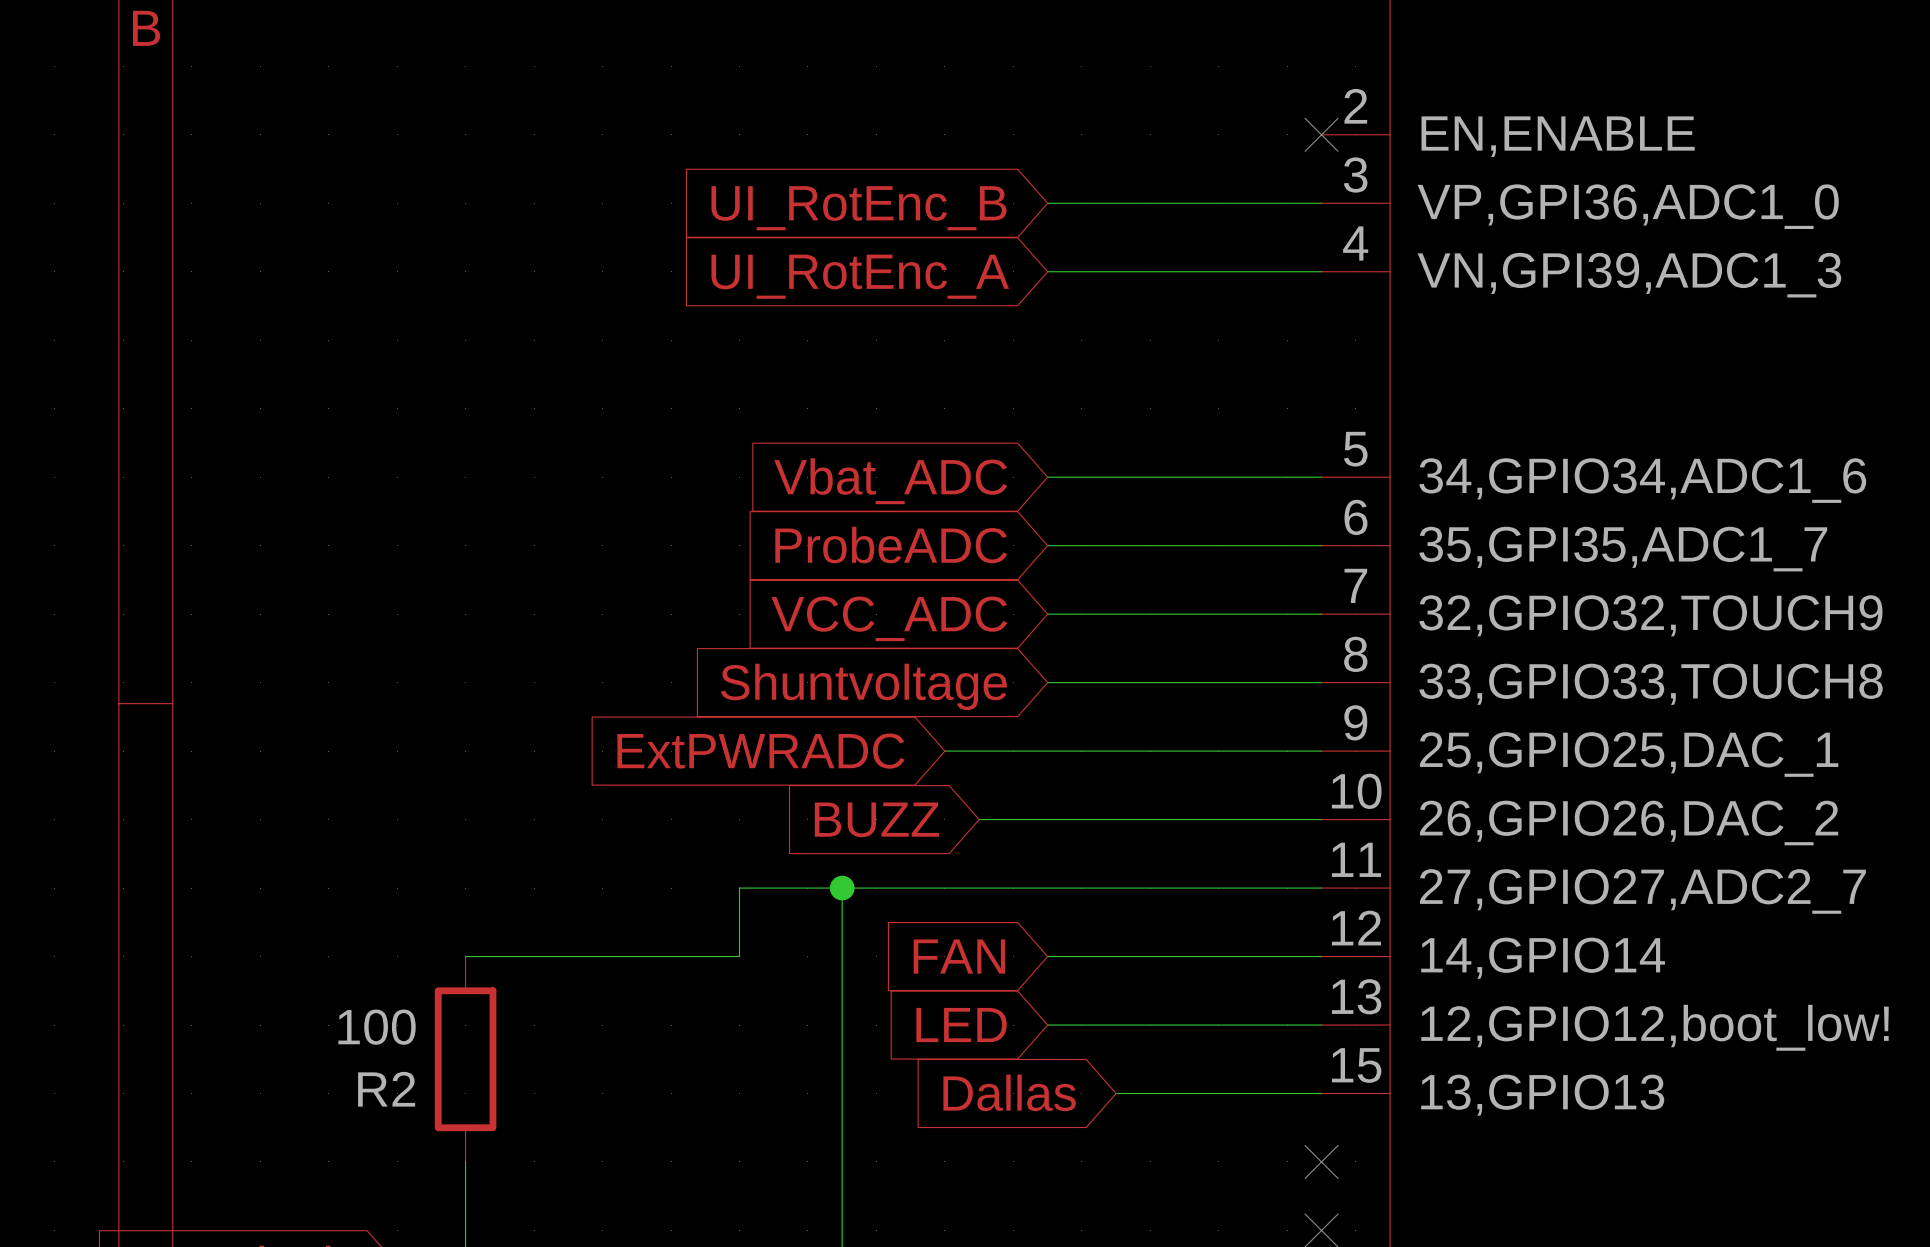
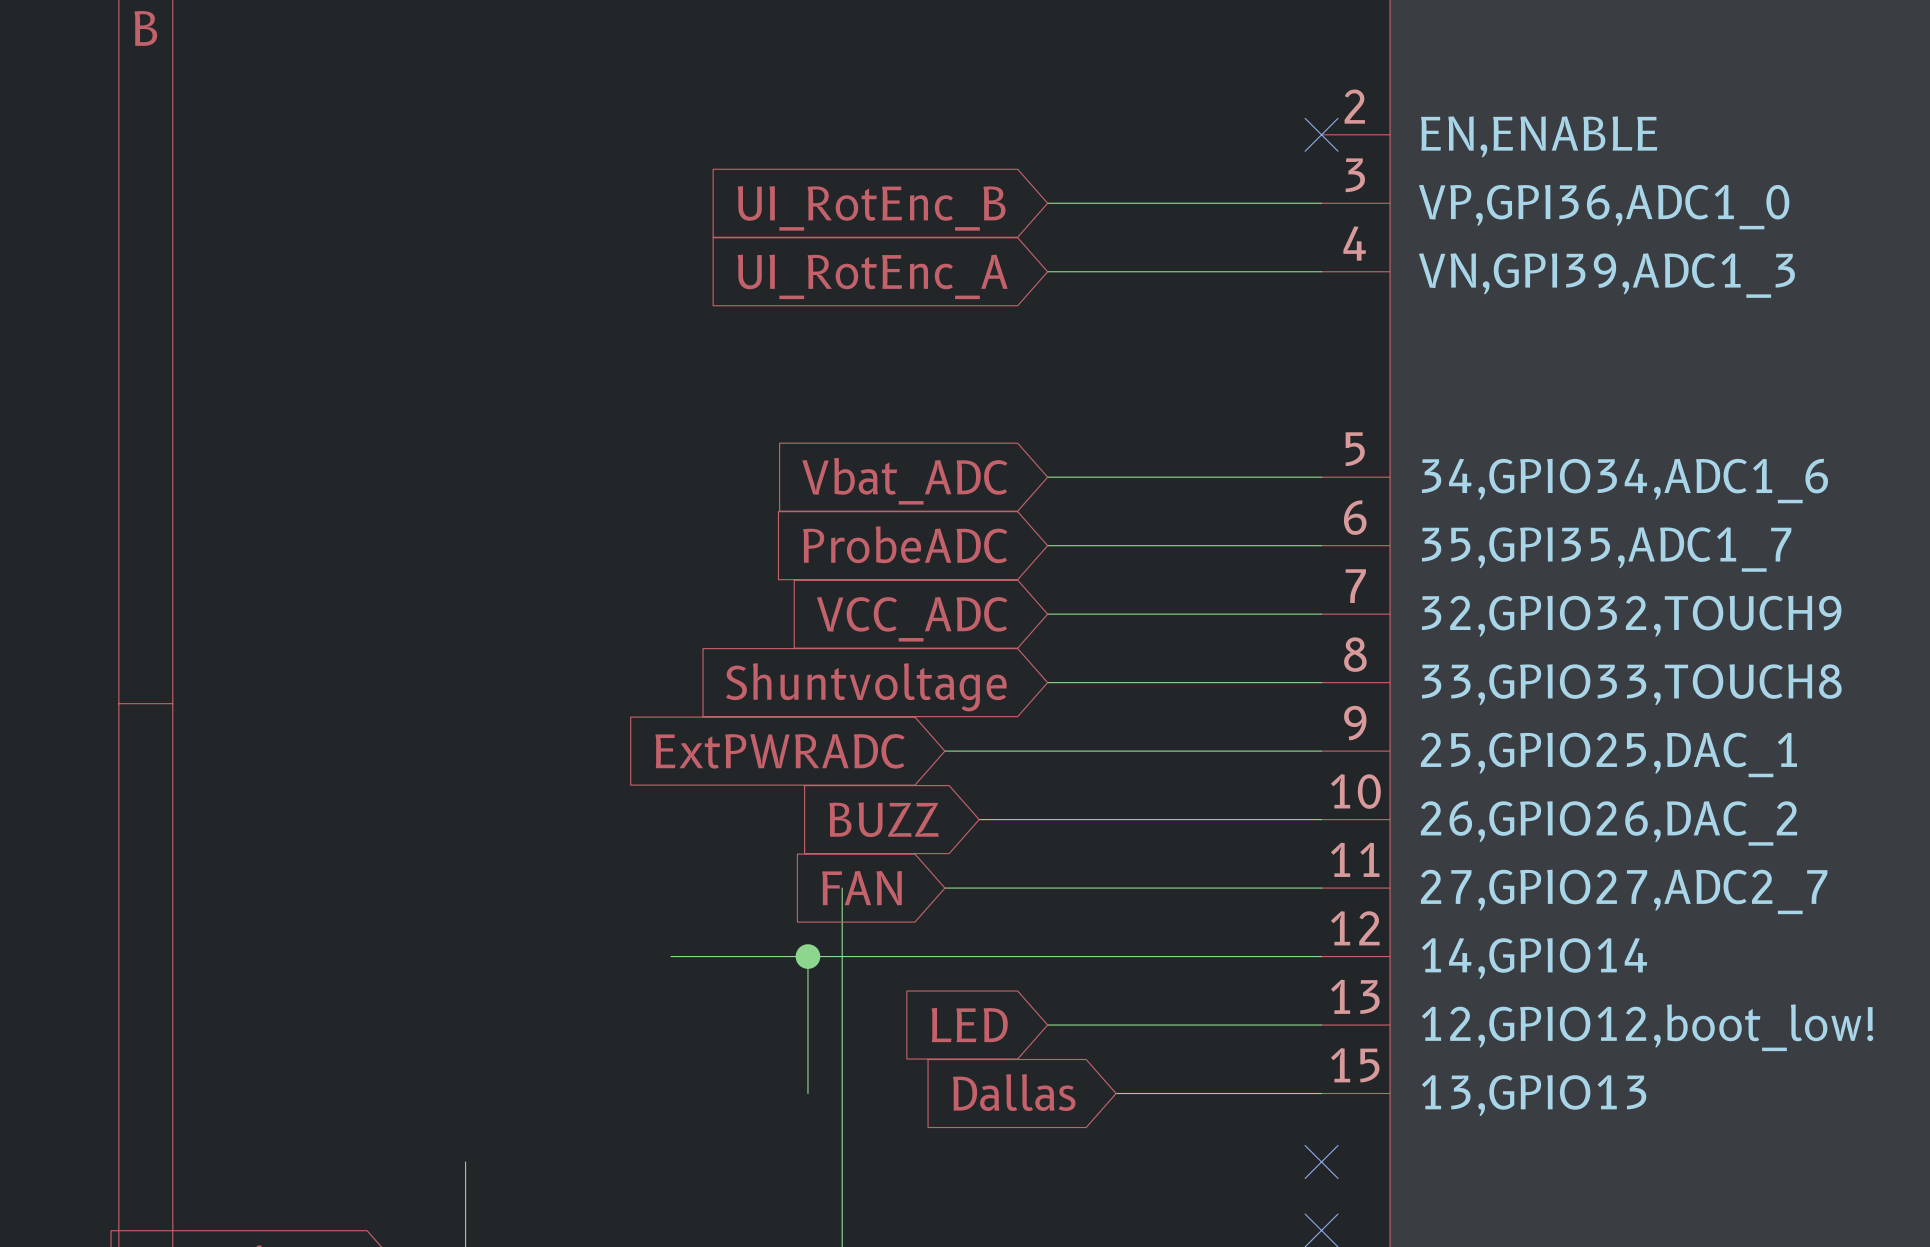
junction position: (842, 888) -> (807, 956)
wire: (944, 888) (739, 888) (739, 956) -> (1047, 956) (739, 956)
wire: (465, 956) (671, 956) -> none
wire: none -> (807, 956) (807, 1093)
global label position: FAN (959, 956) -> FAN (861, 888)
R2: 100 (465, 1059) -> none

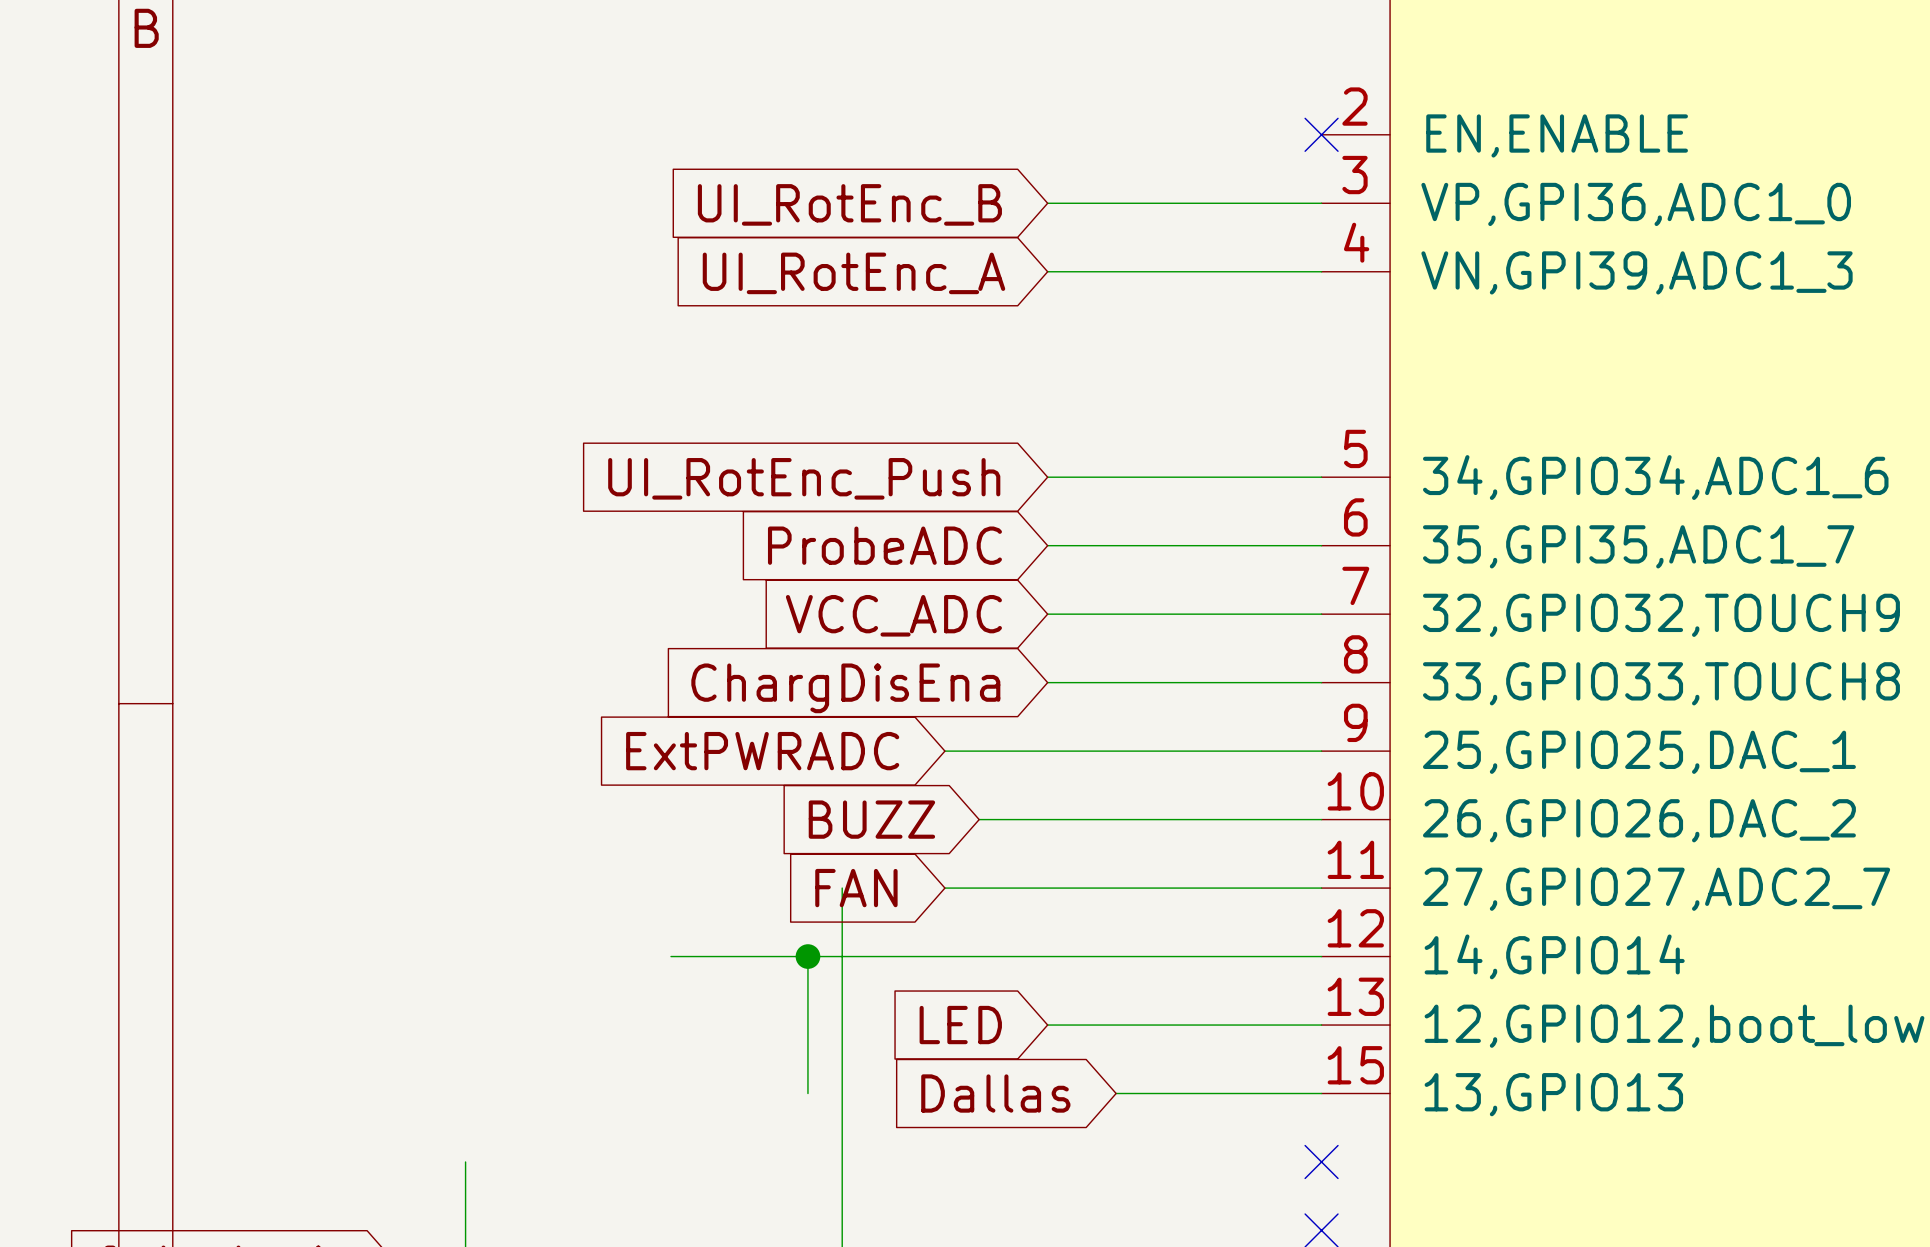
global label: Vbat_ADC (904, 481) -> UI_RotEnc_Push (804, 478)
global label: Shuntvoltage (866, 687) -> ChargDisEna (845, 688)

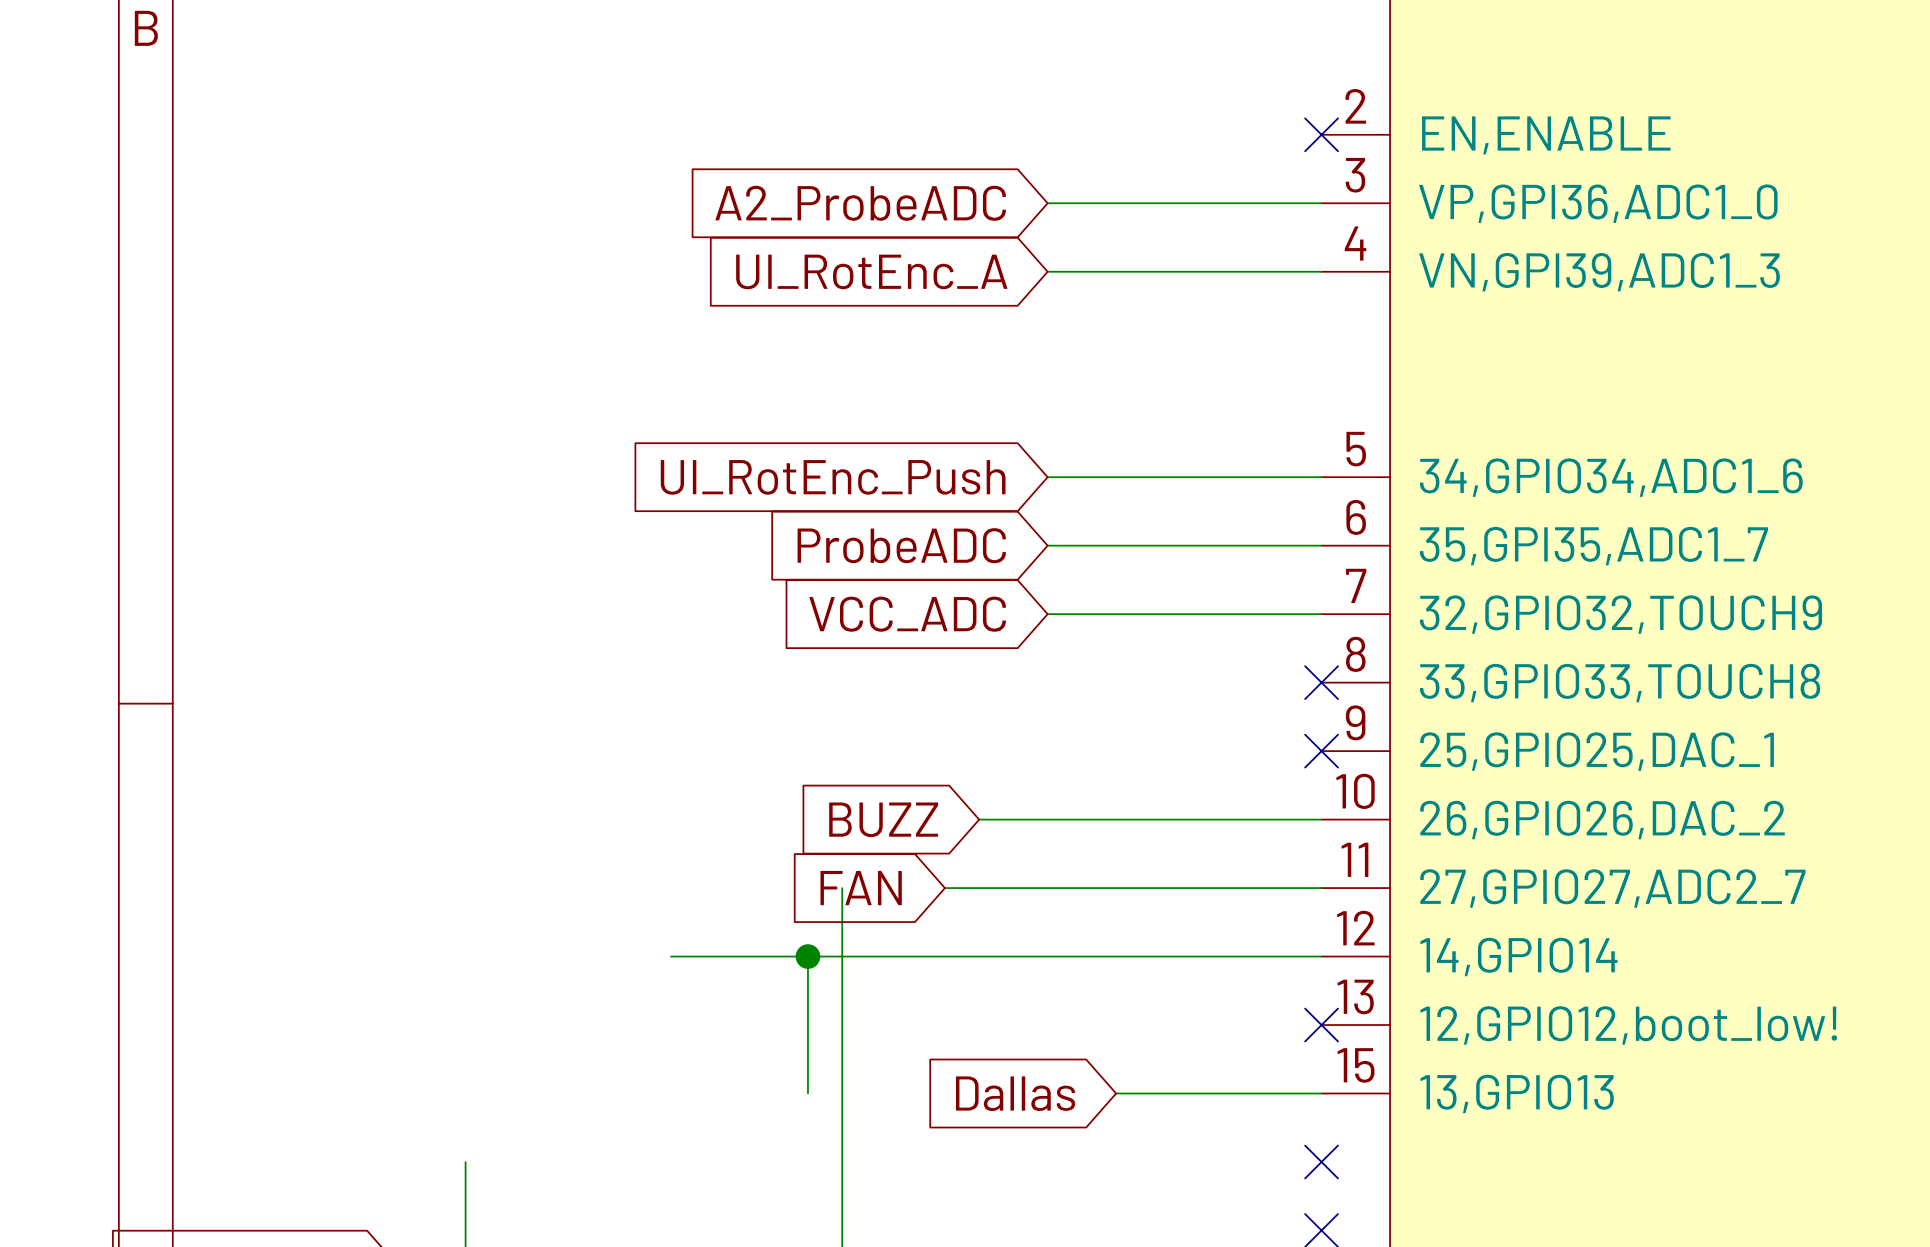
global label: UI_RotEnc_B (849, 204) -> A2_ProbeADC (860, 203)
wire: (1047, 682) (1321, 682) -> none
no-connect mark: none -> (1321, 682)
global label: ChargDisEna (845, 688) -> none
global label: ExtPWRADC (762, 751) -> none
wire: (944, 751) (1321, 751) -> none
no-connect mark: none -> (1321, 751)
global label: LED (960, 1025) -> none
wire: (1047, 1025) (1321, 1025) -> none
no-connect mark: none -> (1321, 1025)

